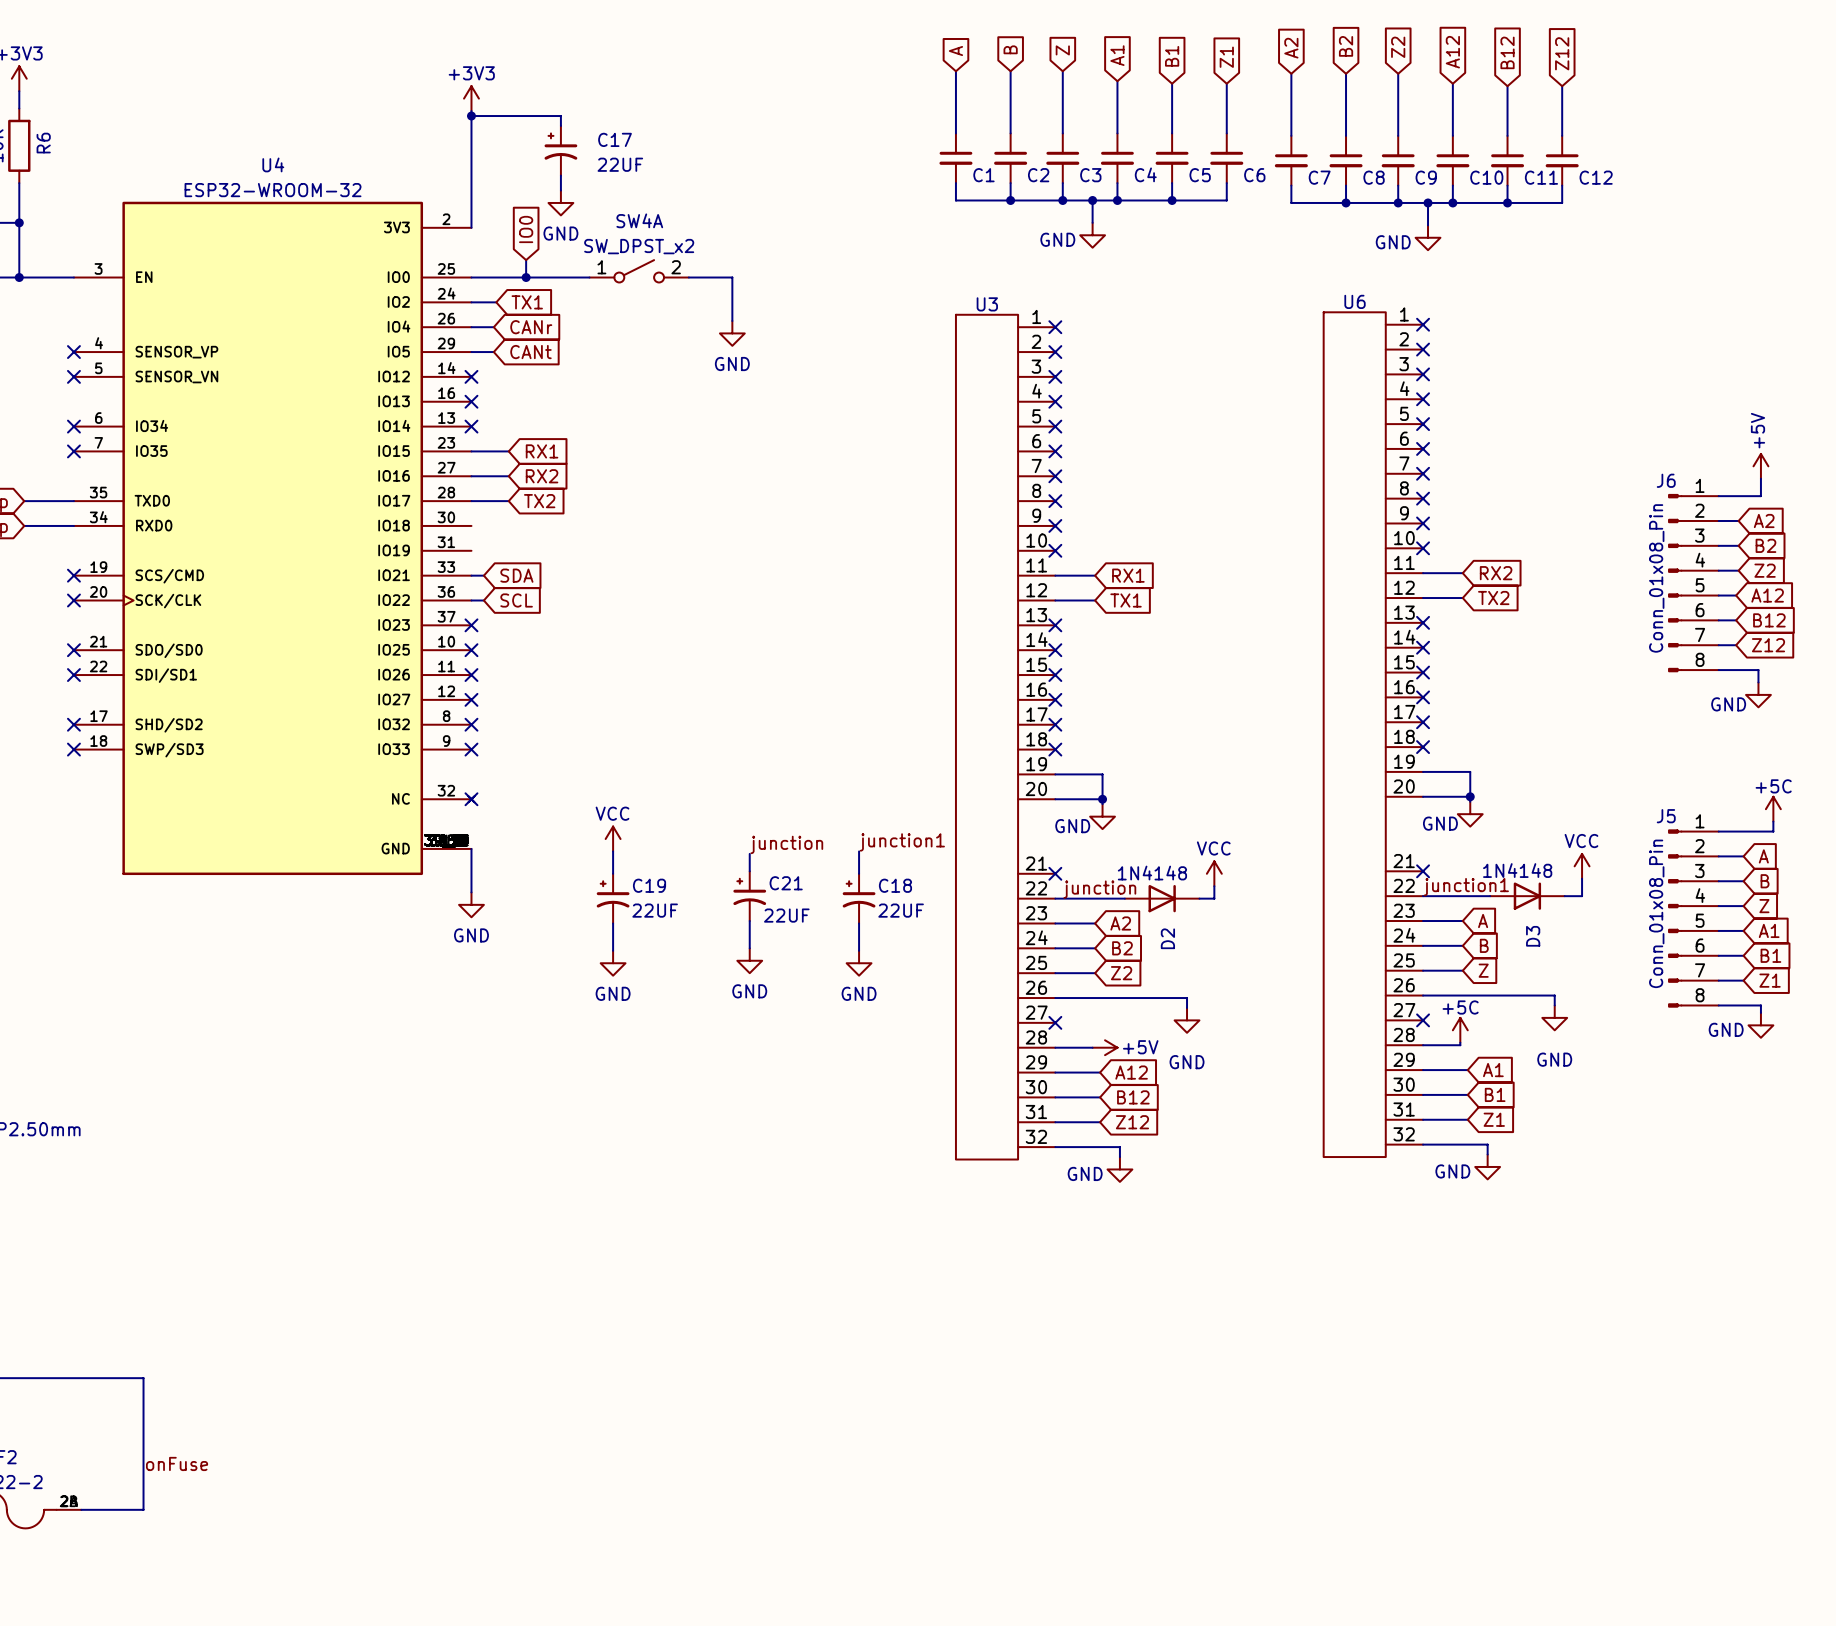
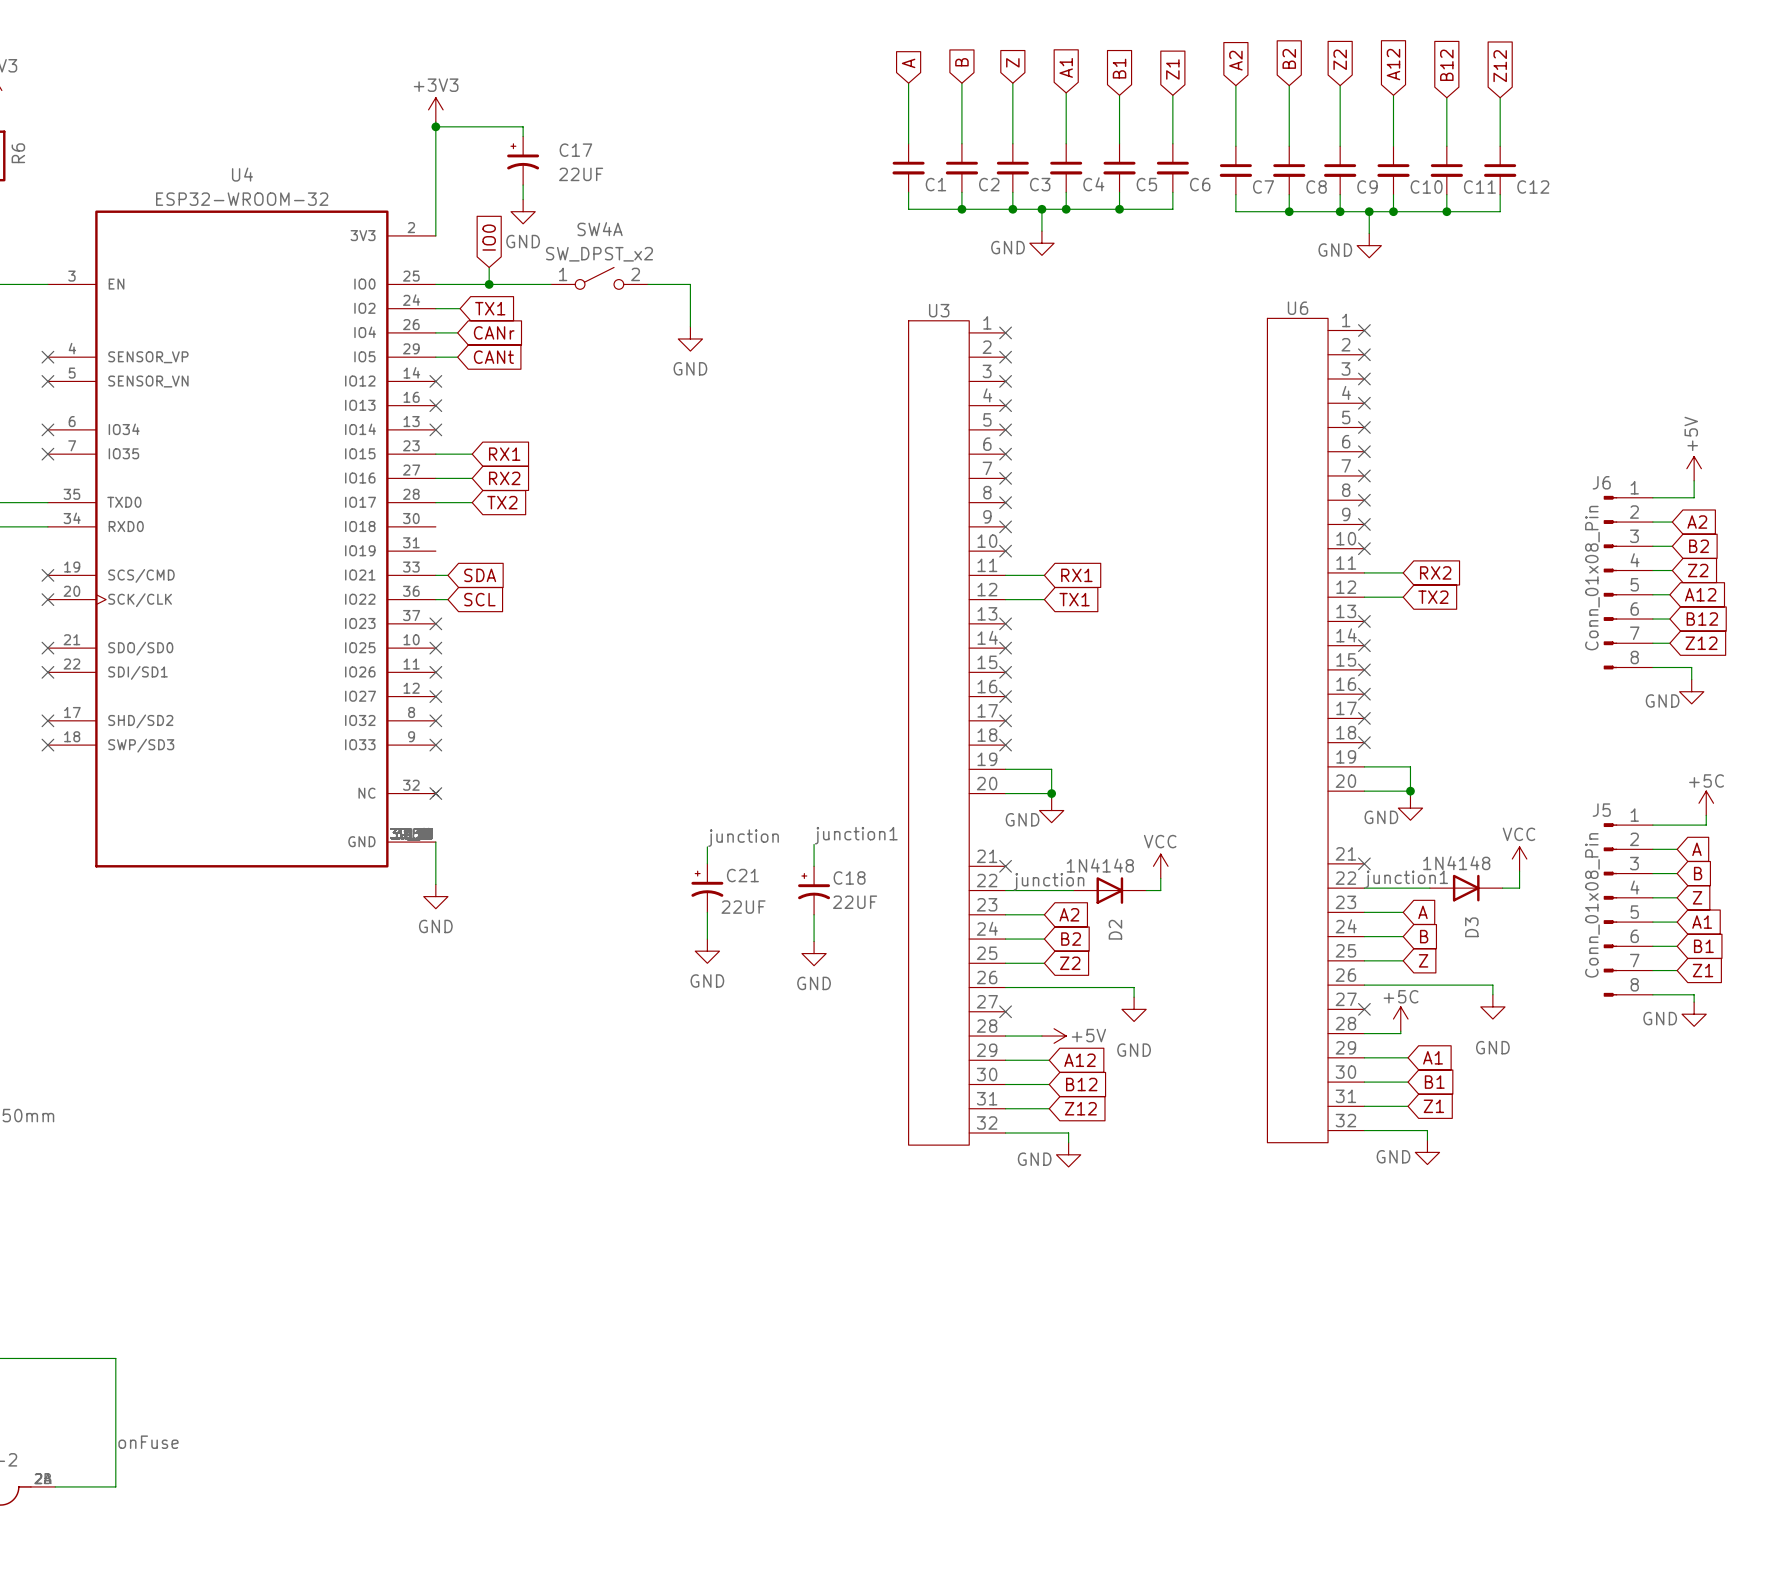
power symbol: VCC (613, 839) -> none
wire: (613, 851) (613, 873) -> none
C19: 22UF (613, 898) -> none
wire: (613, 923) (613, 950) -> none
power symbol: GND (613, 963) -> none

